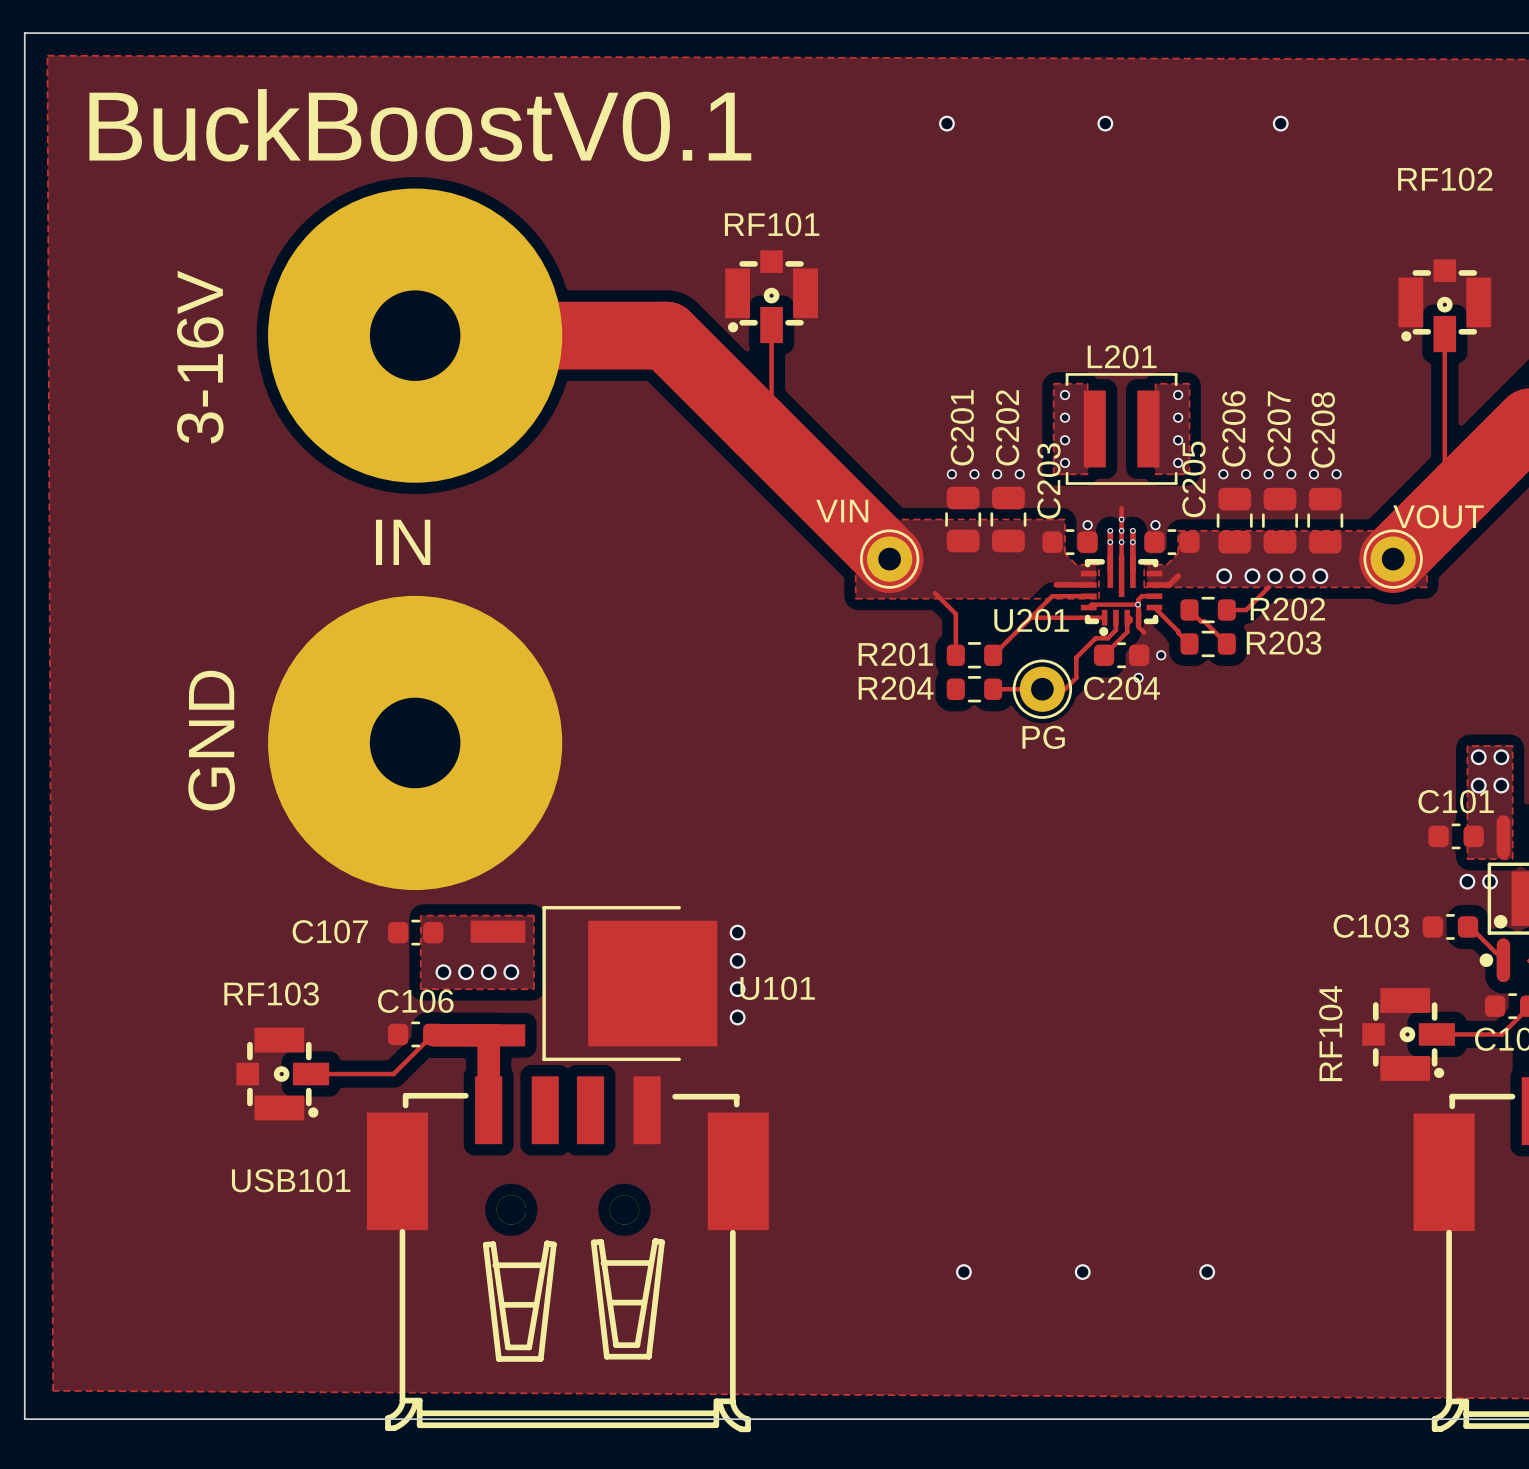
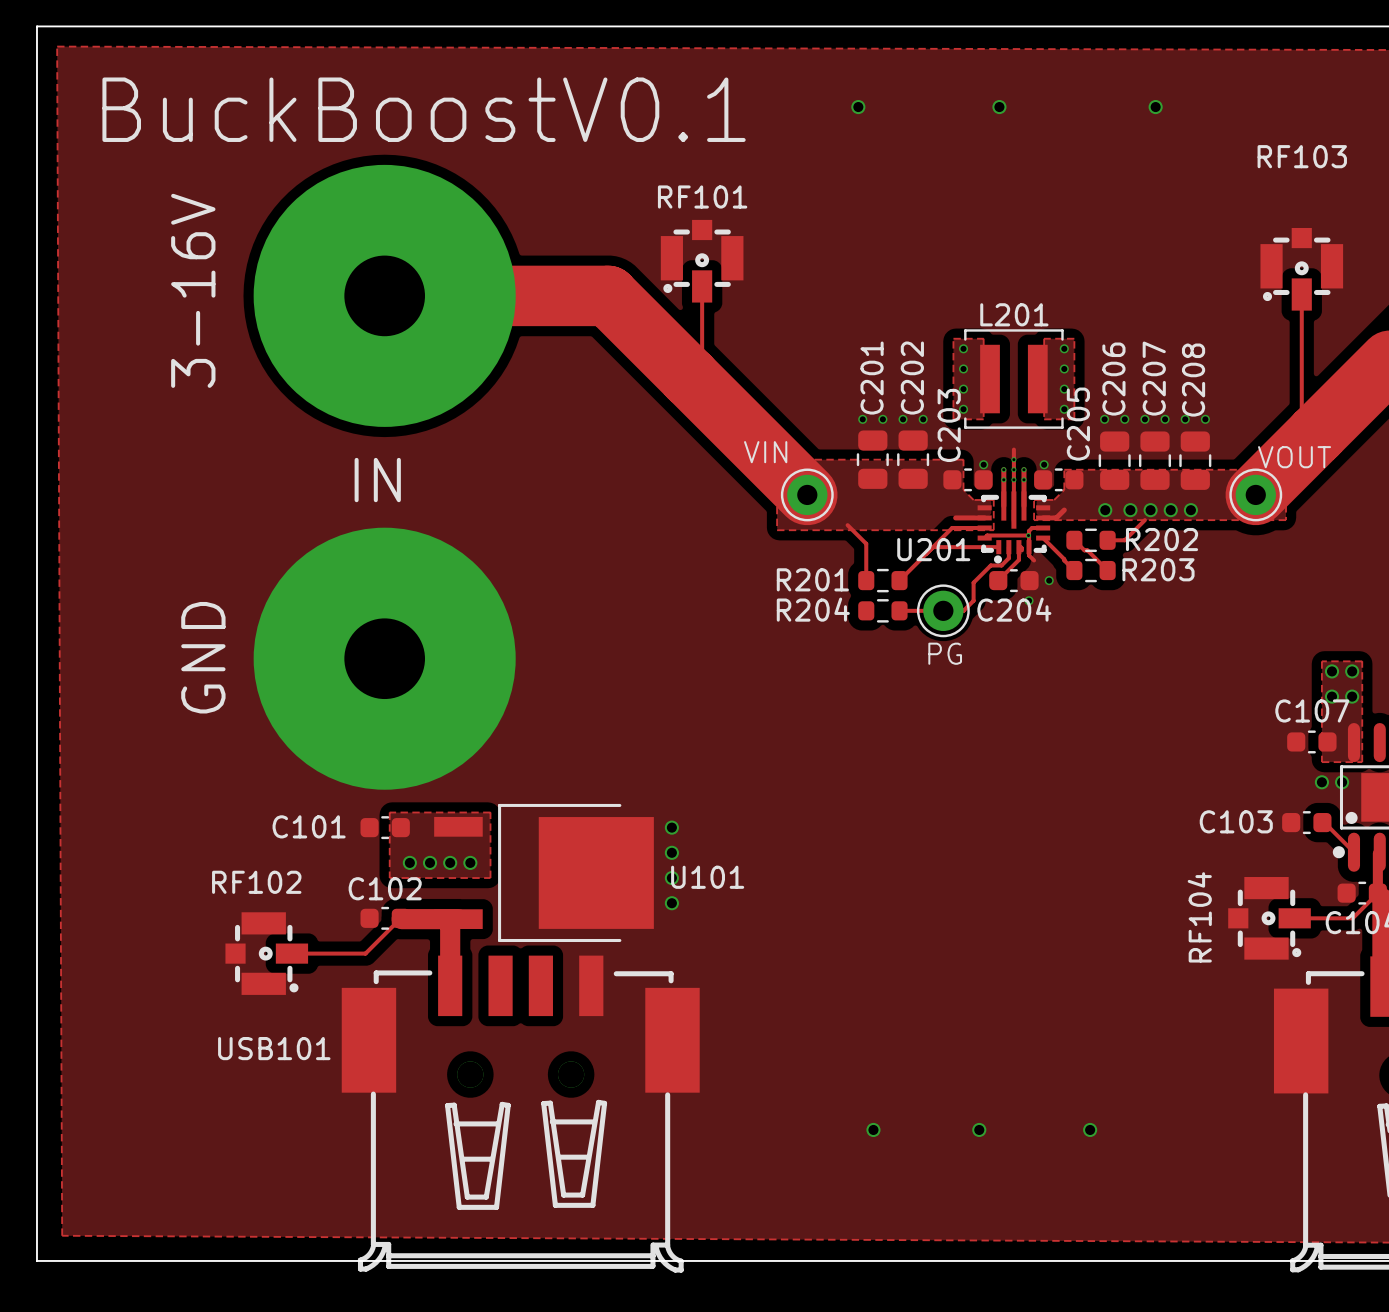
RF102 name: RF102 (1445, 179) -> RF103 (1302, 156)
C101 name: C101 (1456, 801) -> C107 (1312, 710)
C107 name: C107 (330, 931) -> C101 (309, 826)
RF103 name: RF103 (271, 993) -> RF102 (256, 882)
C106 name: C106 (415, 1001) -> C102 (385, 888)

